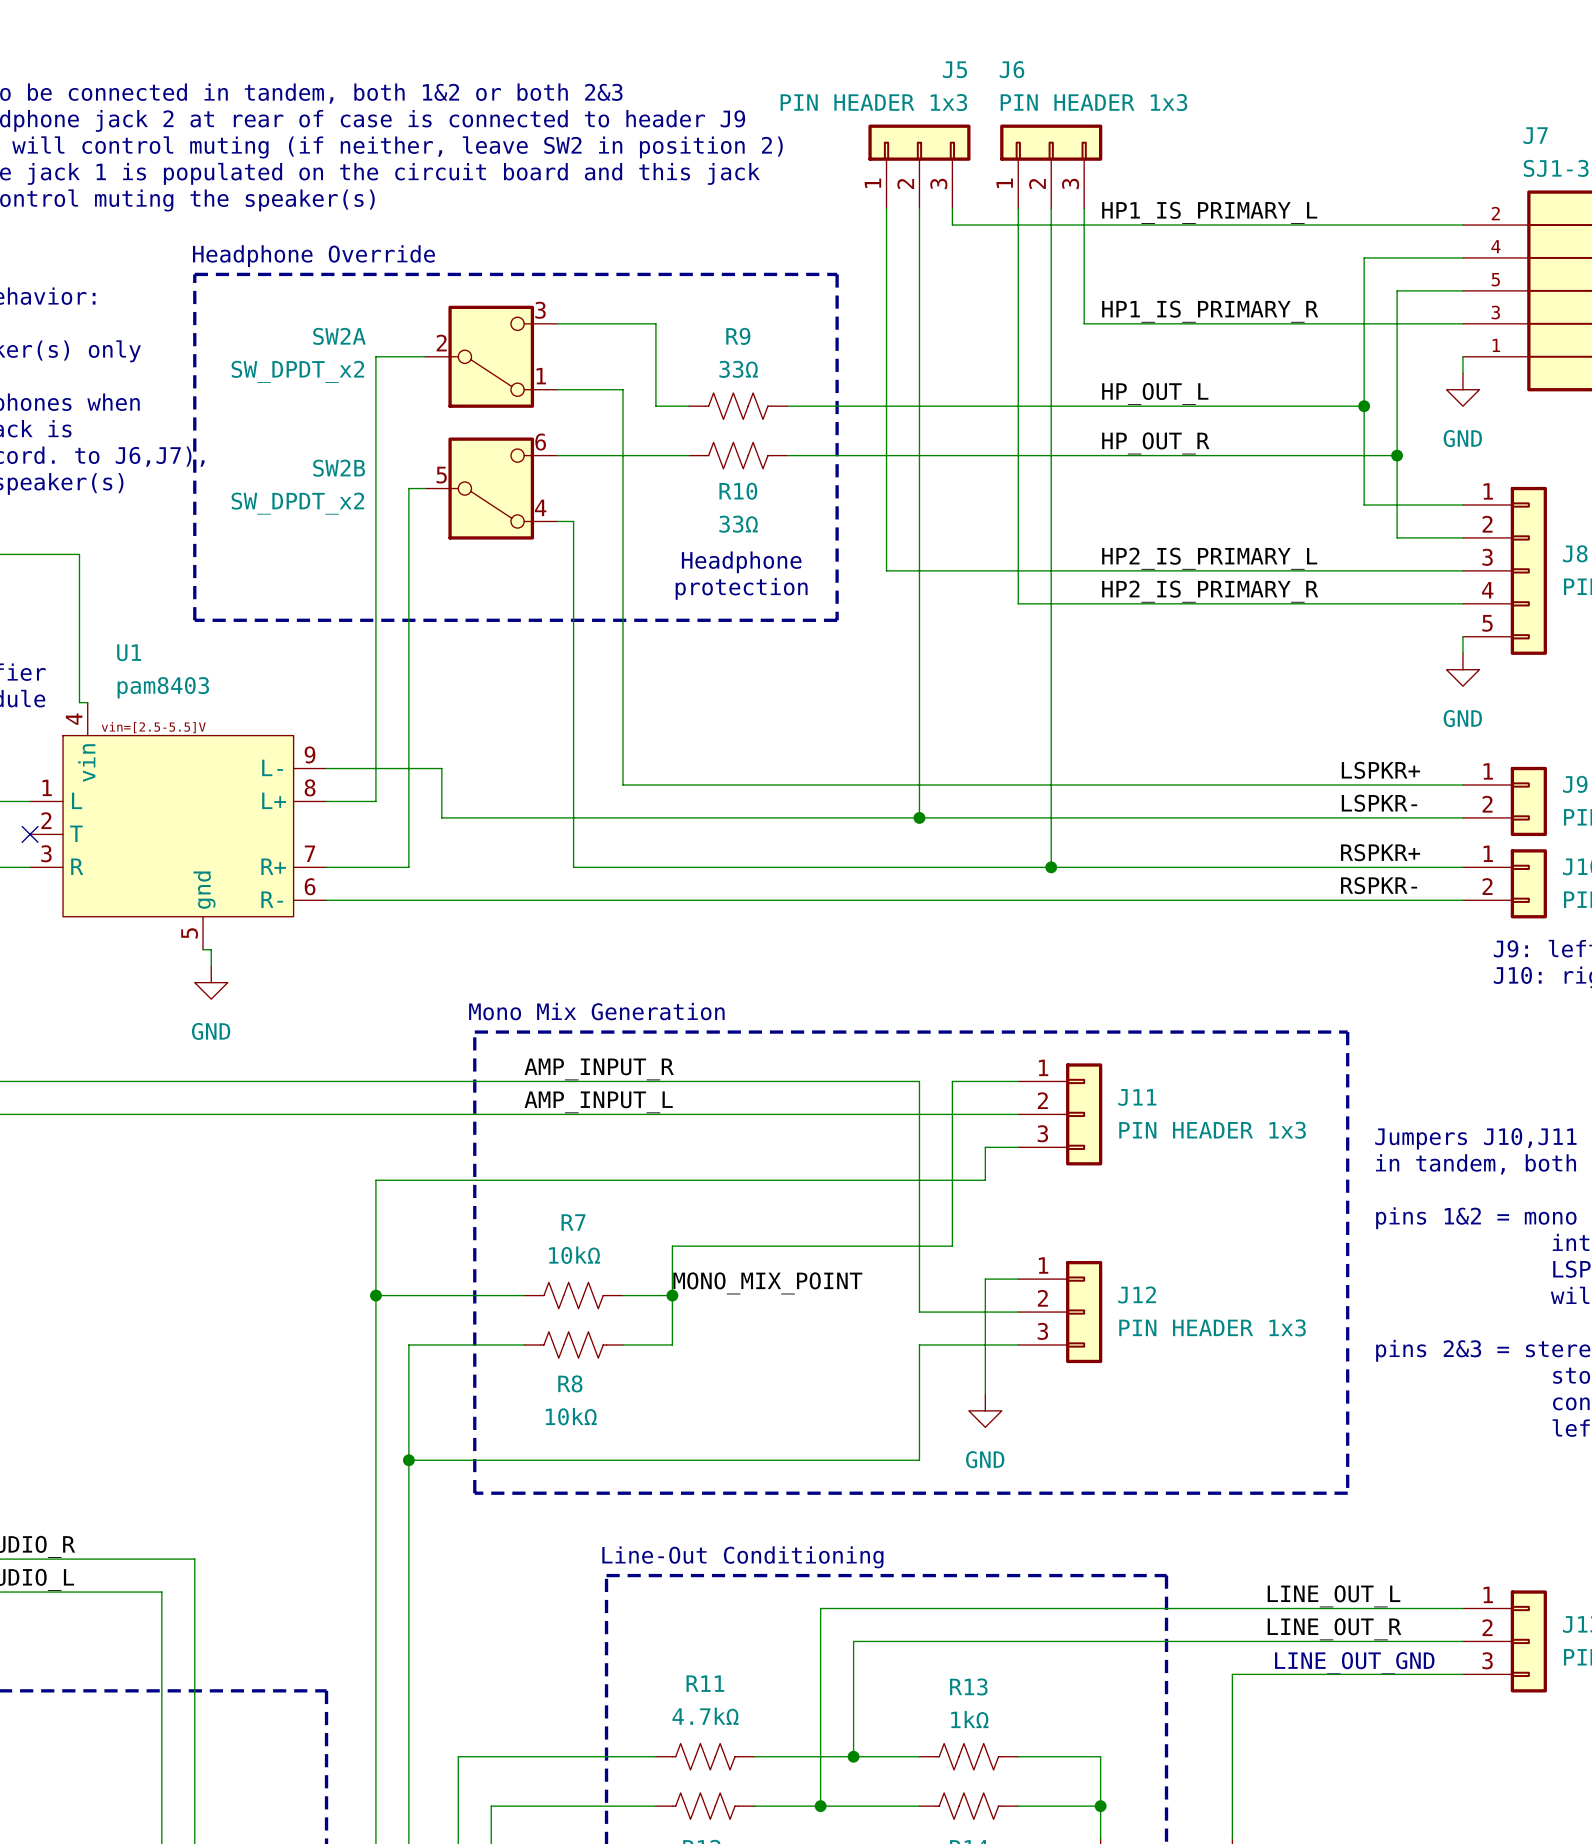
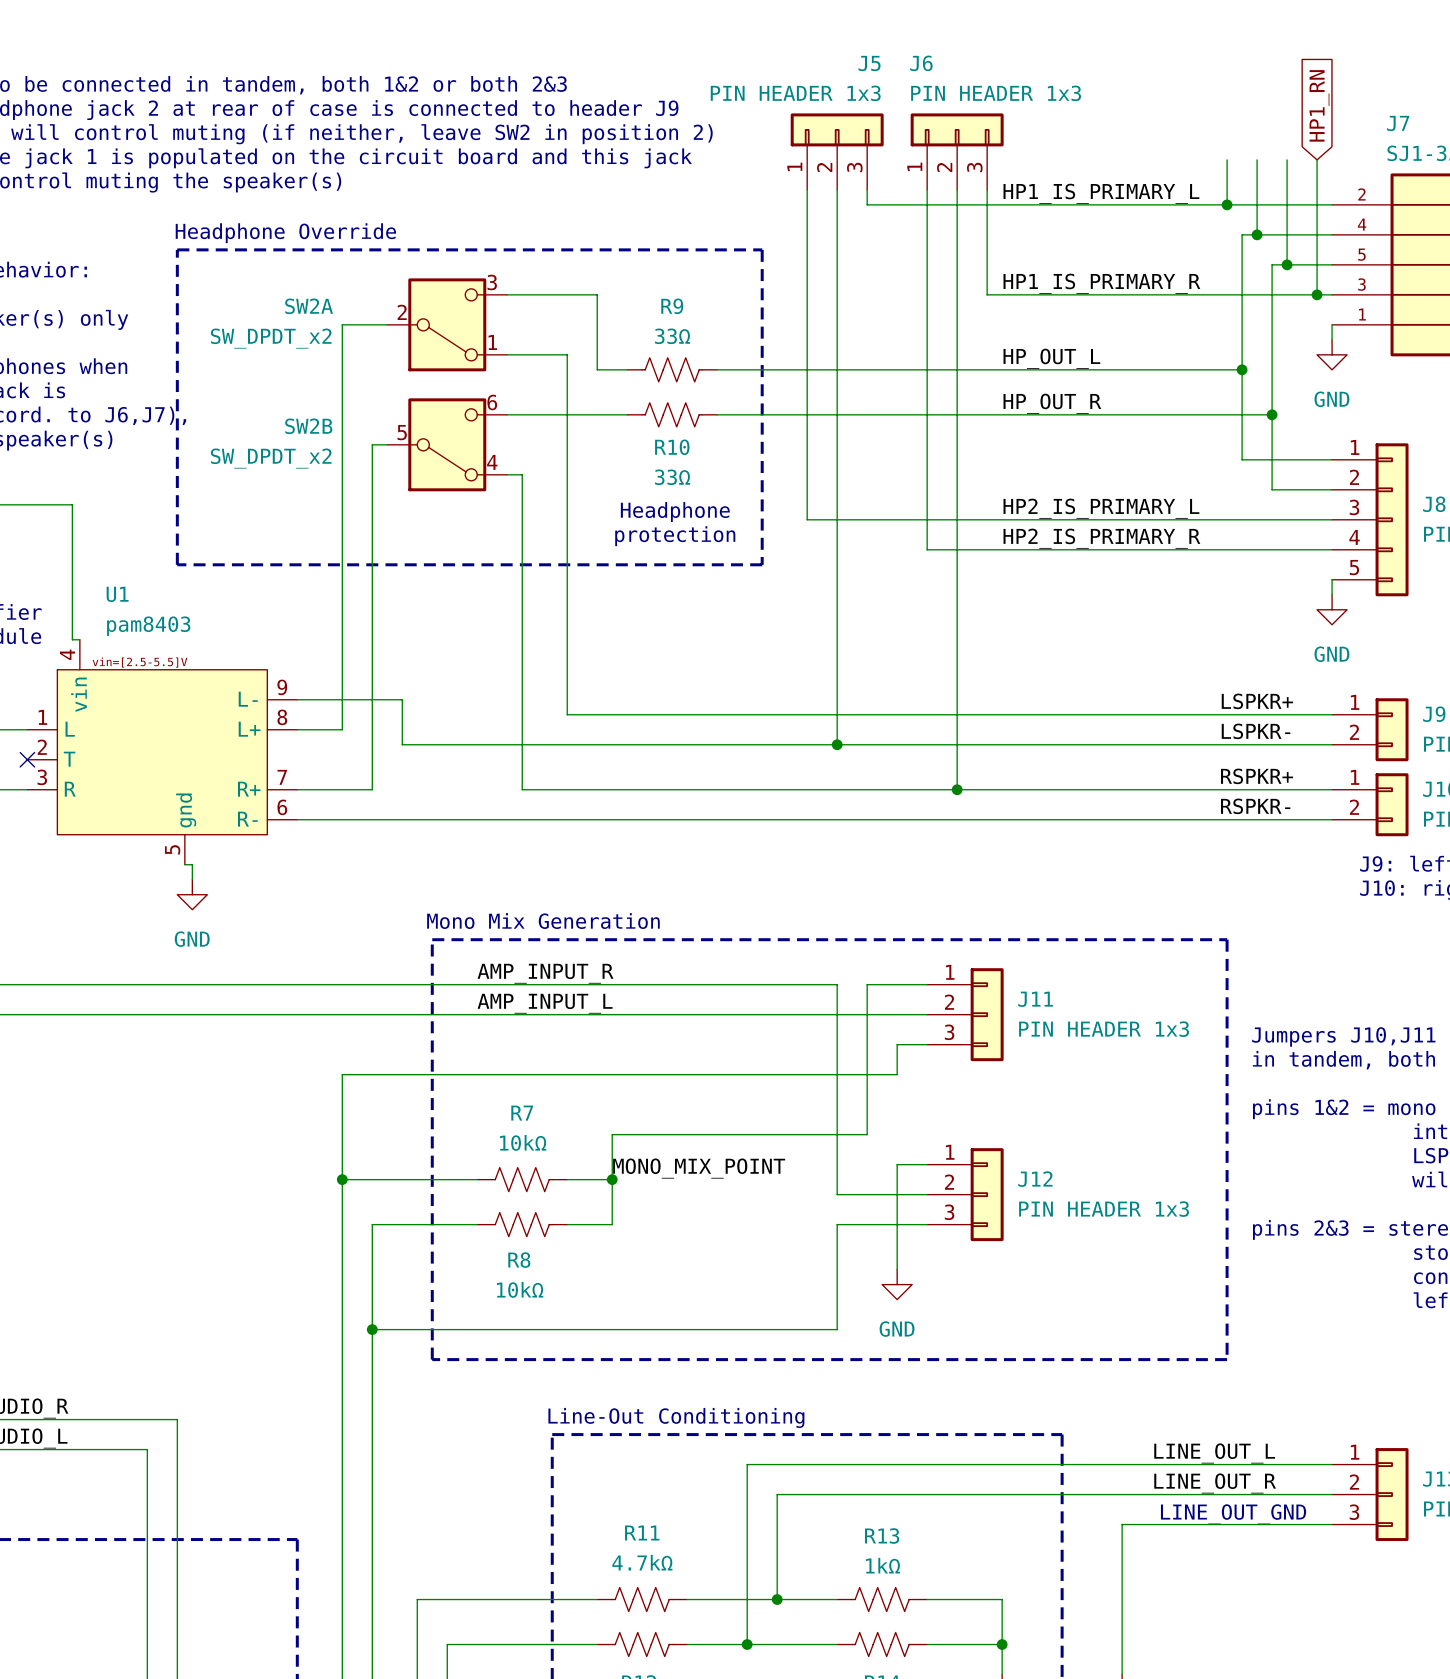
global label: none -> HP1_RN (1319, 105)
wire: none -> (1227, 159) (1227, 204)
wire: none -> (1257, 159) (1257, 234)
wire: none -> (1287, 159) (1287, 264)
wire: none -> (1317, 159) (1317, 294)
junction: none -> (1227, 204)
junction: none -> (1257, 234)
junction: none -> (1287, 264)
junction: none -> (1317, 294)

